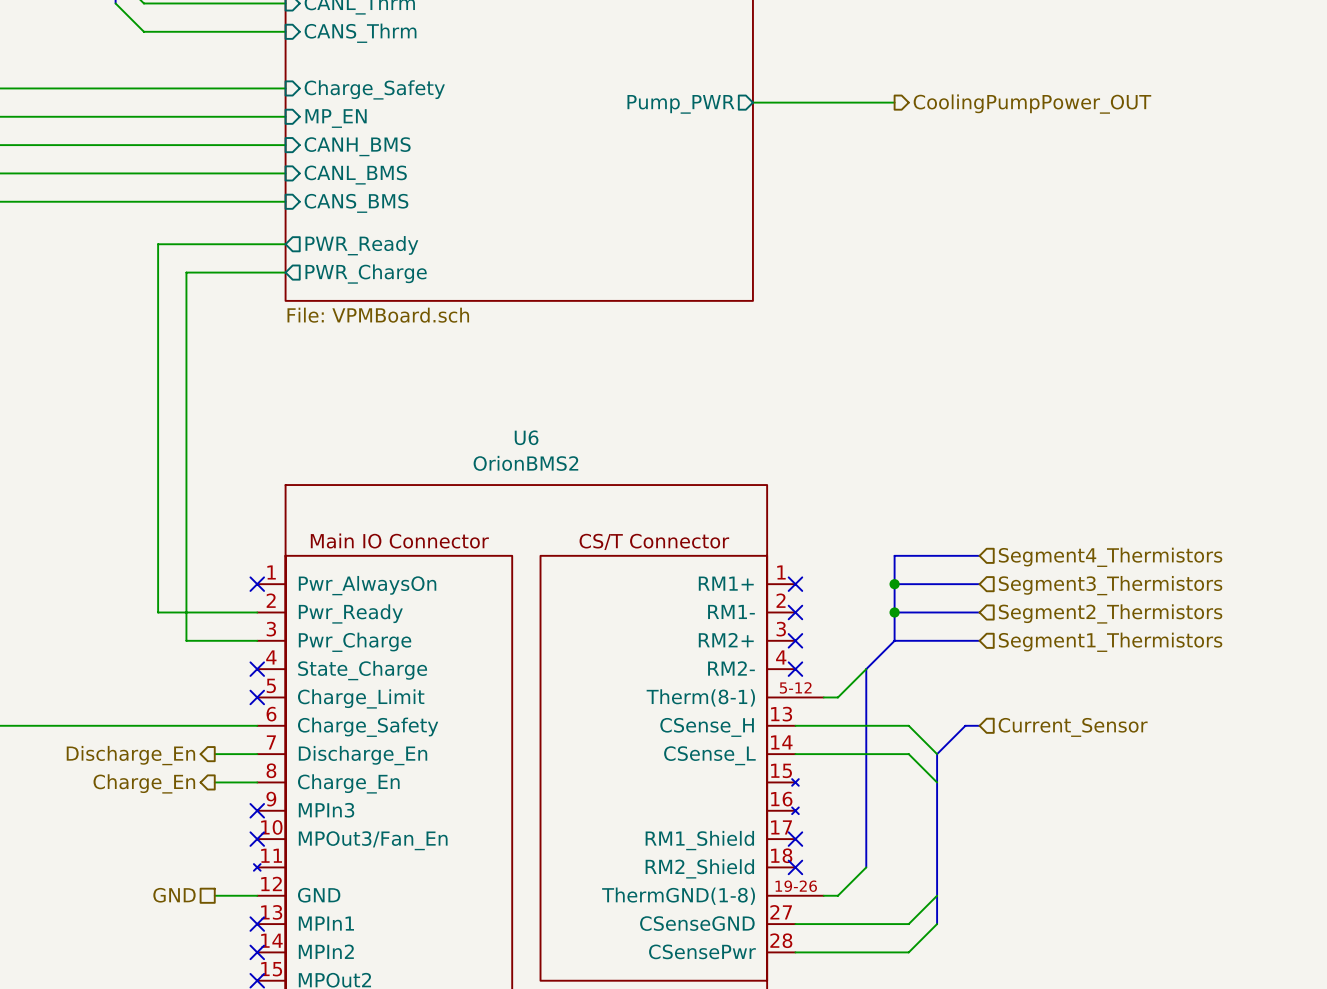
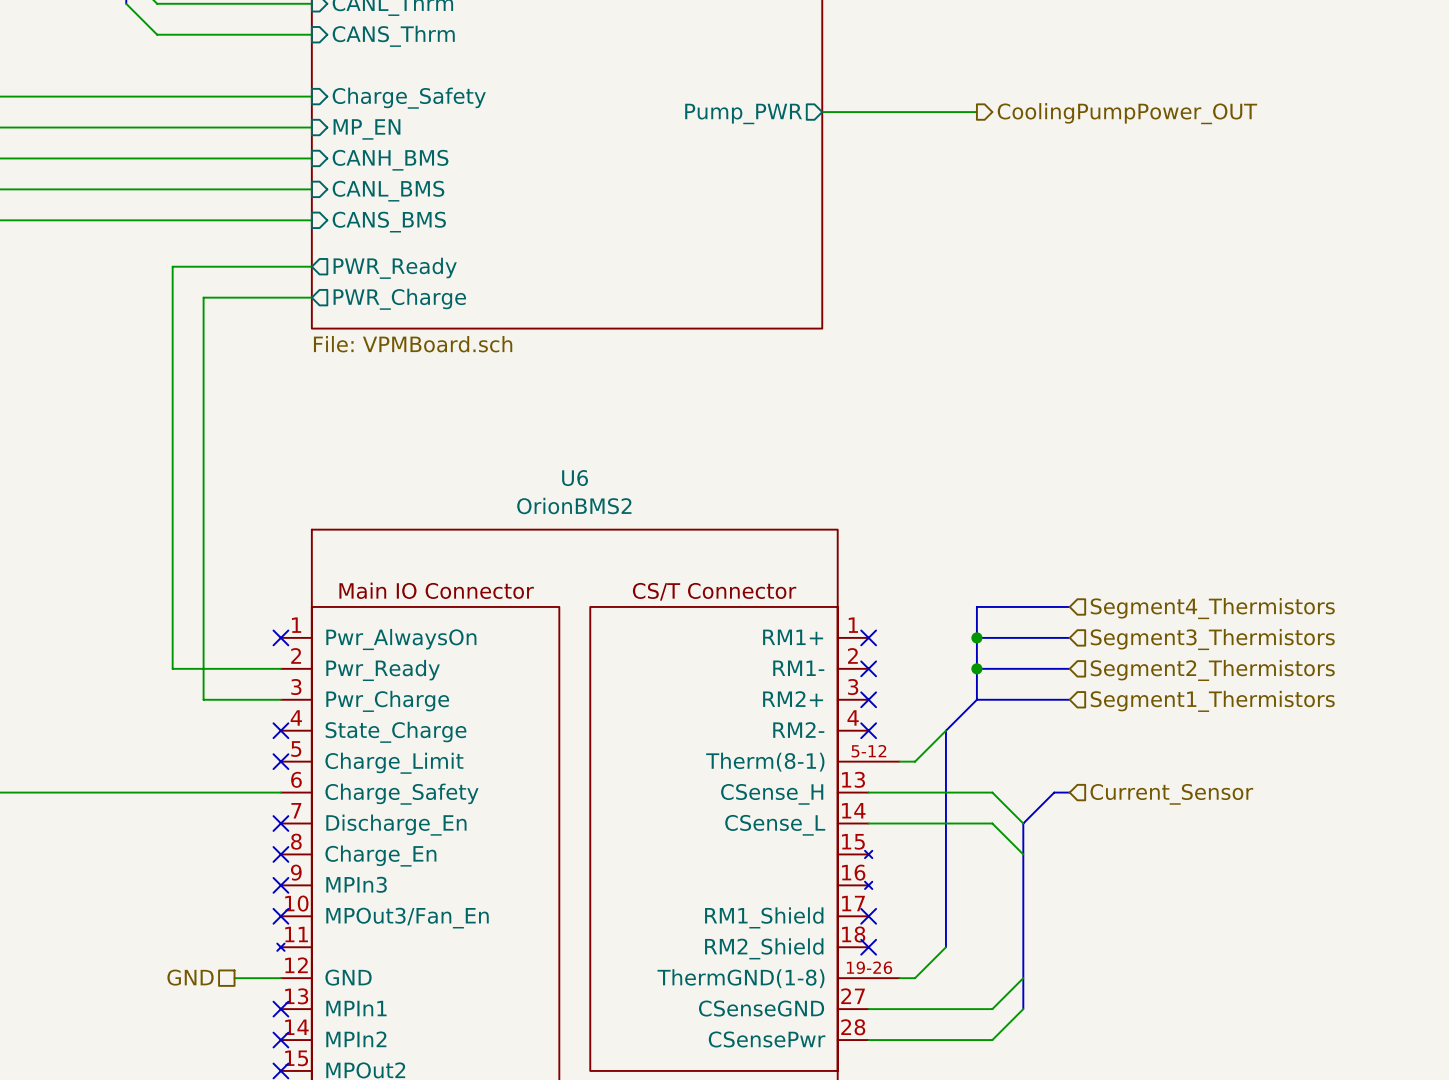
wire: (214, 754) (257, 754) -> none
no-connect mark: none -> (280, 823)
hierarchical label: Discharge_En (130, 755) -> none
wire: (214, 782) (257, 782) -> none
no-connect mark: none -> (280, 854)
hierarchical label: Charge_En (144, 783) -> none

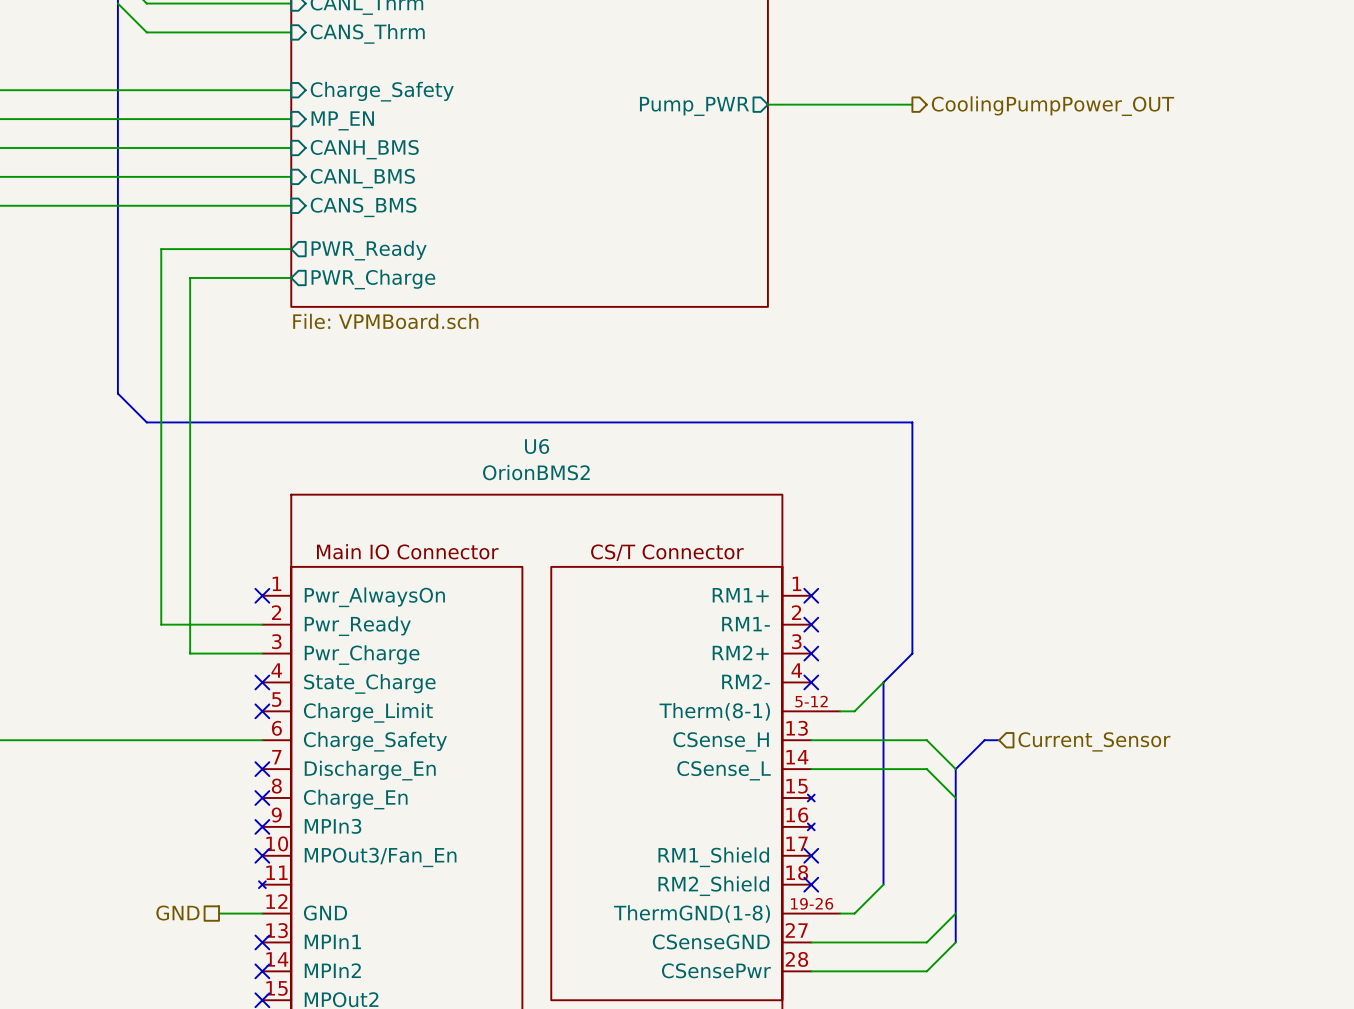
bus: (976, 606) (1069, 606) -> (912, 566) (912, 422) (146, 422) (117, 393) (117, 3)
hierarchical label: Segment4_Thermistors (1212, 608) -> none
bus: (976, 637) (1069, 637) -> none
junction: (976, 637) -> none
hierarchical label: Segment3_Thermistors (1212, 639) -> none
bus: (976, 668) (1069, 668) -> none
junction: (976, 668) -> none
hierarchical label: Segment2_Thermistors (1212, 670) -> none
bus: (976, 699) (1069, 699) -> none
hierarchical label: Segment1_Thermistors (1212, 701) -> none

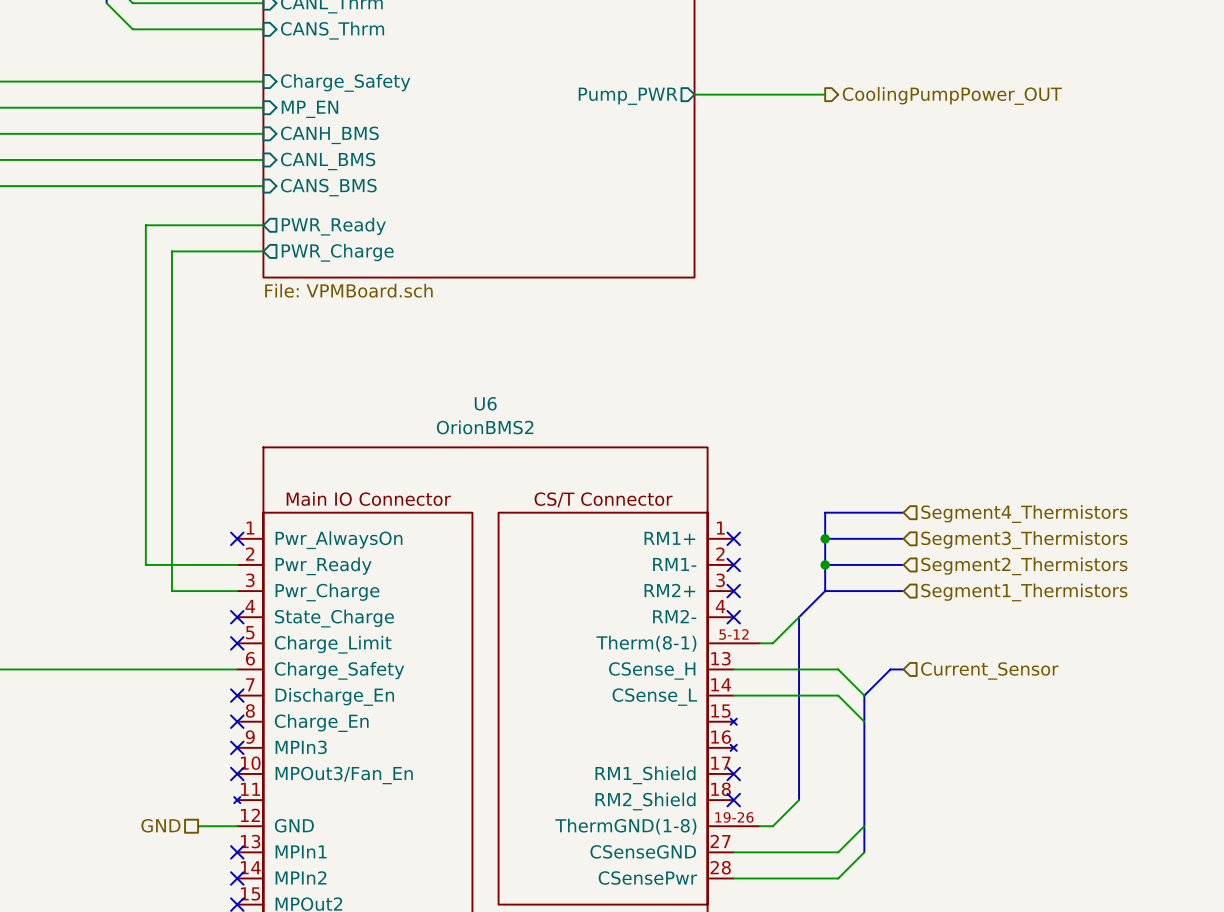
bus: (117, 3) (117, 393) (146, 422) (912, 422) (912, 566) -> (903, 512) (825, 512)
hierarchical label: none -> Segment4_Thermistors (1024, 514)
bus: none -> (825, 538) (903, 538)
junction: none -> (825, 538)
hierarchical label: none -> Segment3_Thermistors (1024, 540)
bus: none -> (825, 564) (903, 564)
junction: none -> (825, 564)
hierarchical label: none -> Segment2_Thermistors (1024, 566)
bus: none -> (825, 591) (903, 591)
hierarchical label: none -> Segment1_Thermistors (1024, 592)

